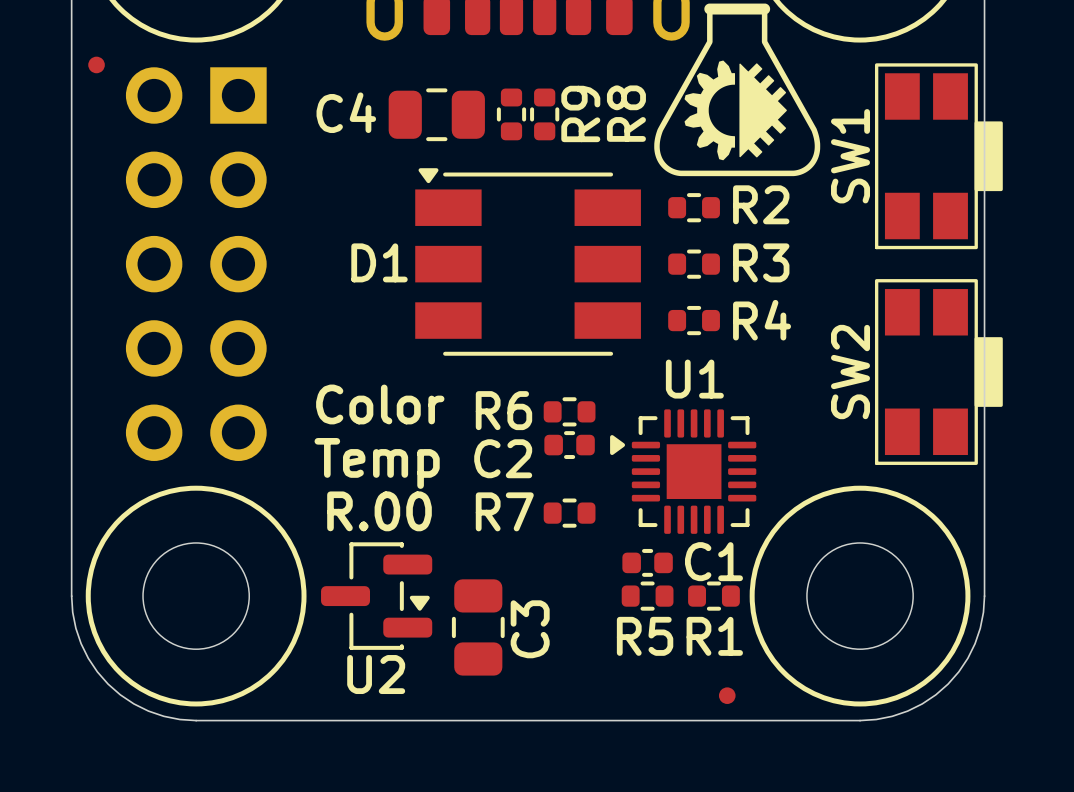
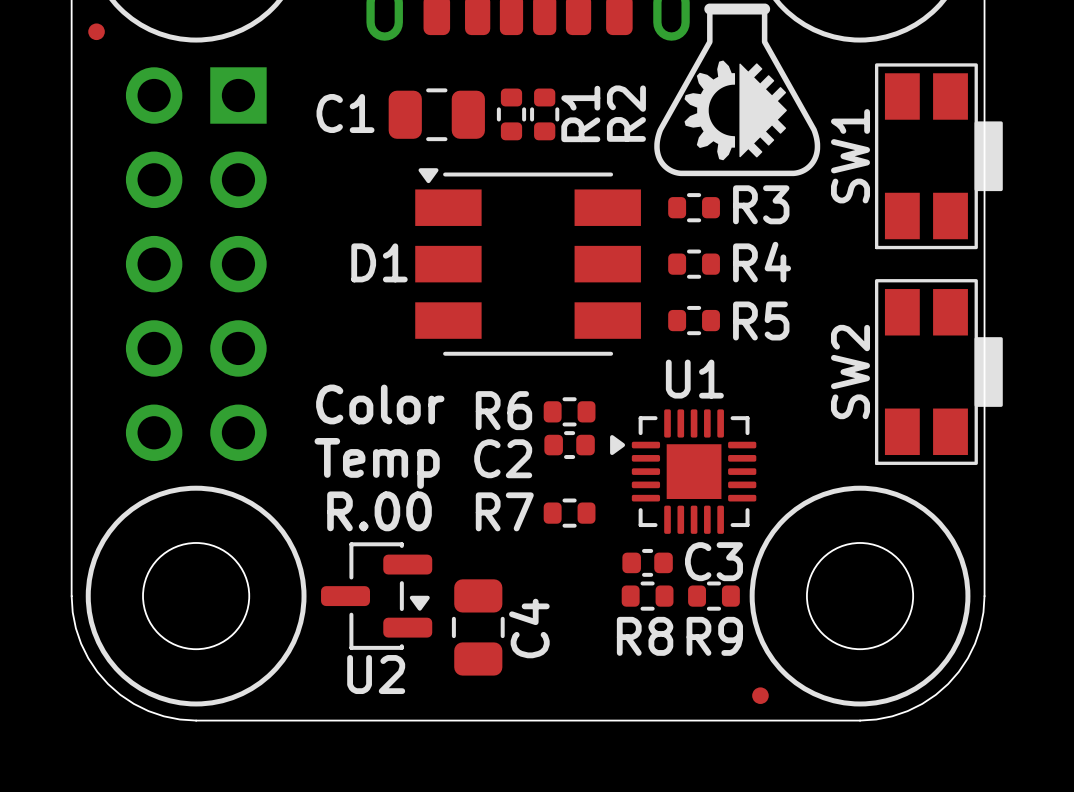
part position: (96, 64) -> (96, 31)
C4 name: C4 (346, 112) -> C1 (345, 113)
R9 name: R9 (580, 113) -> R1 (580, 113)
R8 name: R8 (626, 113) -> R2 (626, 113)
R2 name: R2 (761, 204) -> R3 (761, 204)
R3 name: R3 (761, 262) -> R4 (762, 262)
R4 name: R4 (762, 320) -> R5 (761, 320)
C1 name: C1 (713, 561) -> C3 (713, 561)
C3 name: C3 (530, 629) -> C4 (529, 628)
R5 name: R5 (645, 636) -> R8 (645, 636)
R1 name: R1 (714, 636) -> R9 (714, 636)
part position: (727, 695) -> (760, 695)

